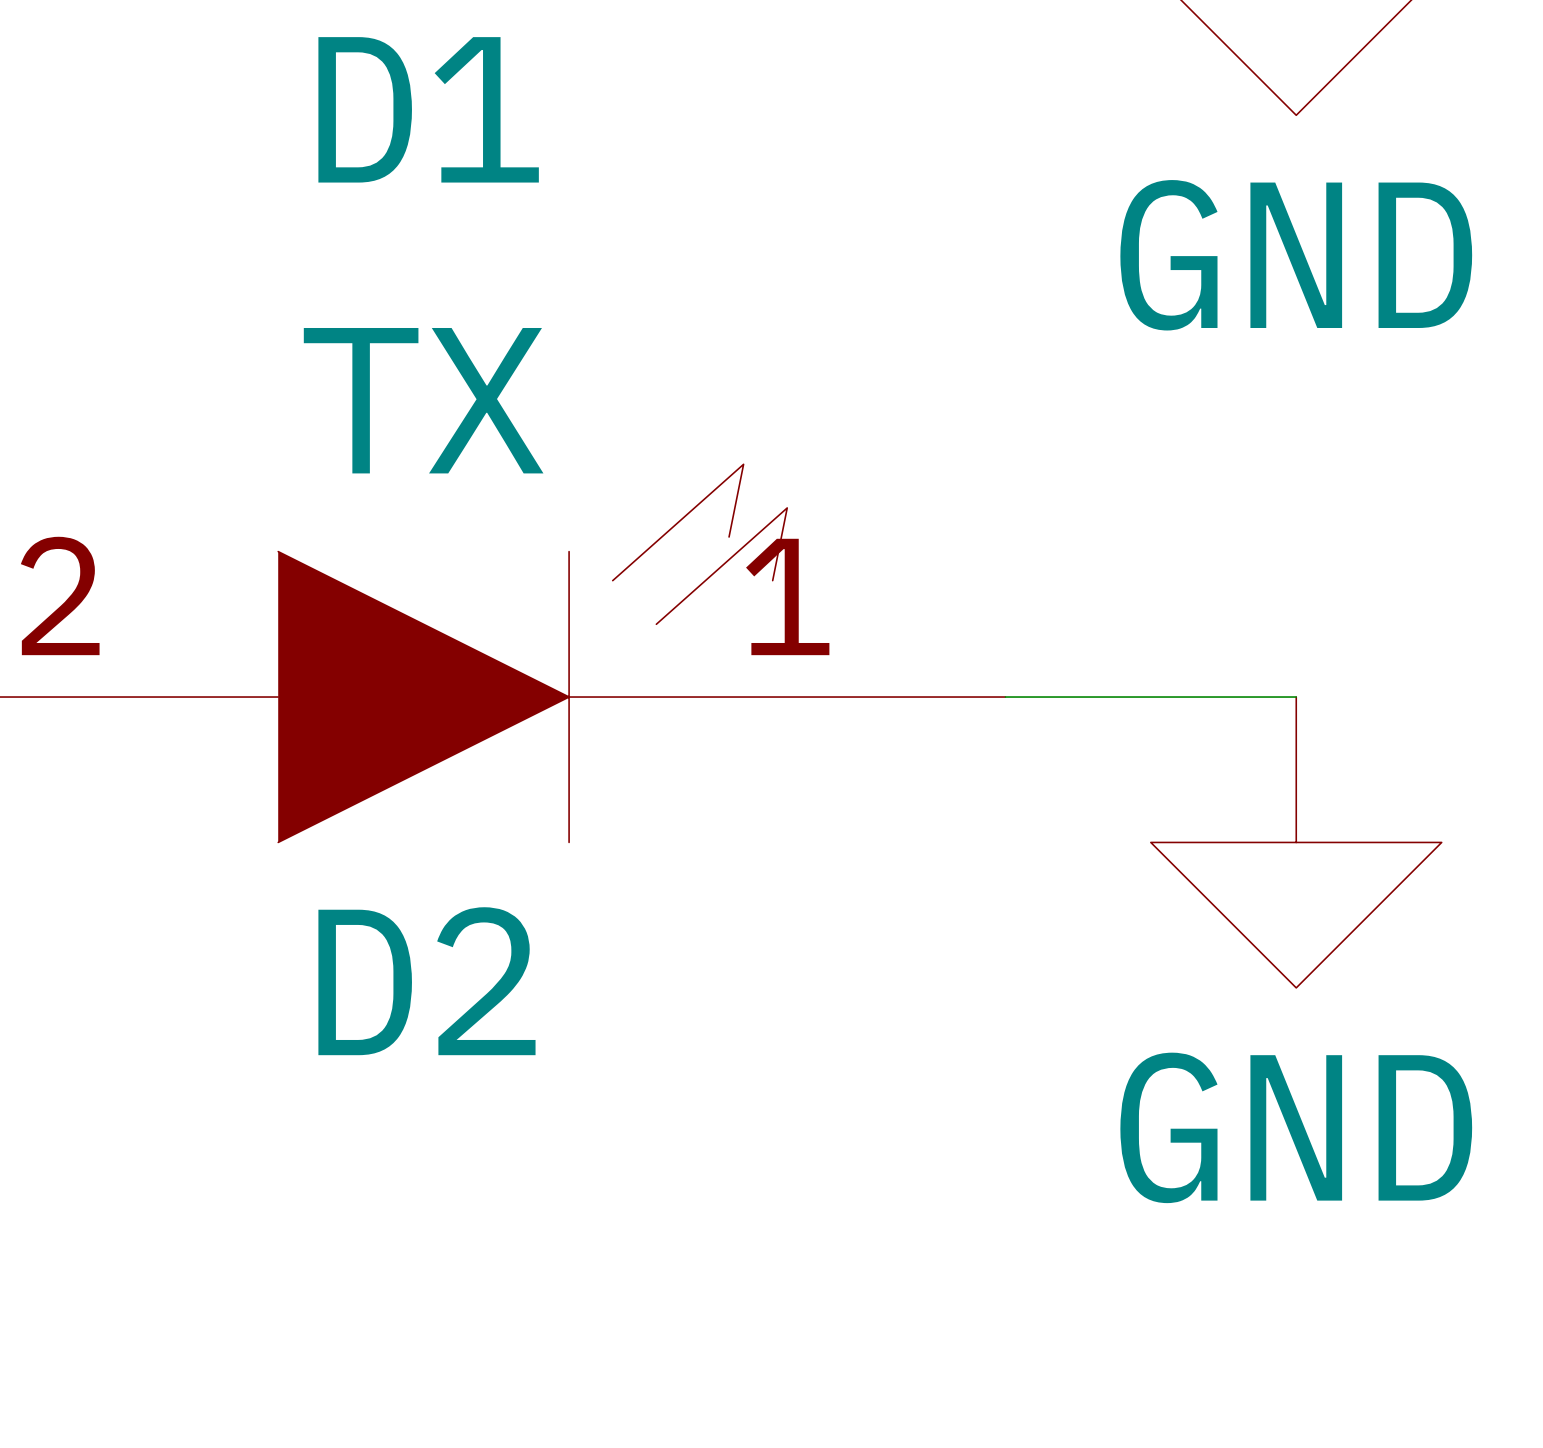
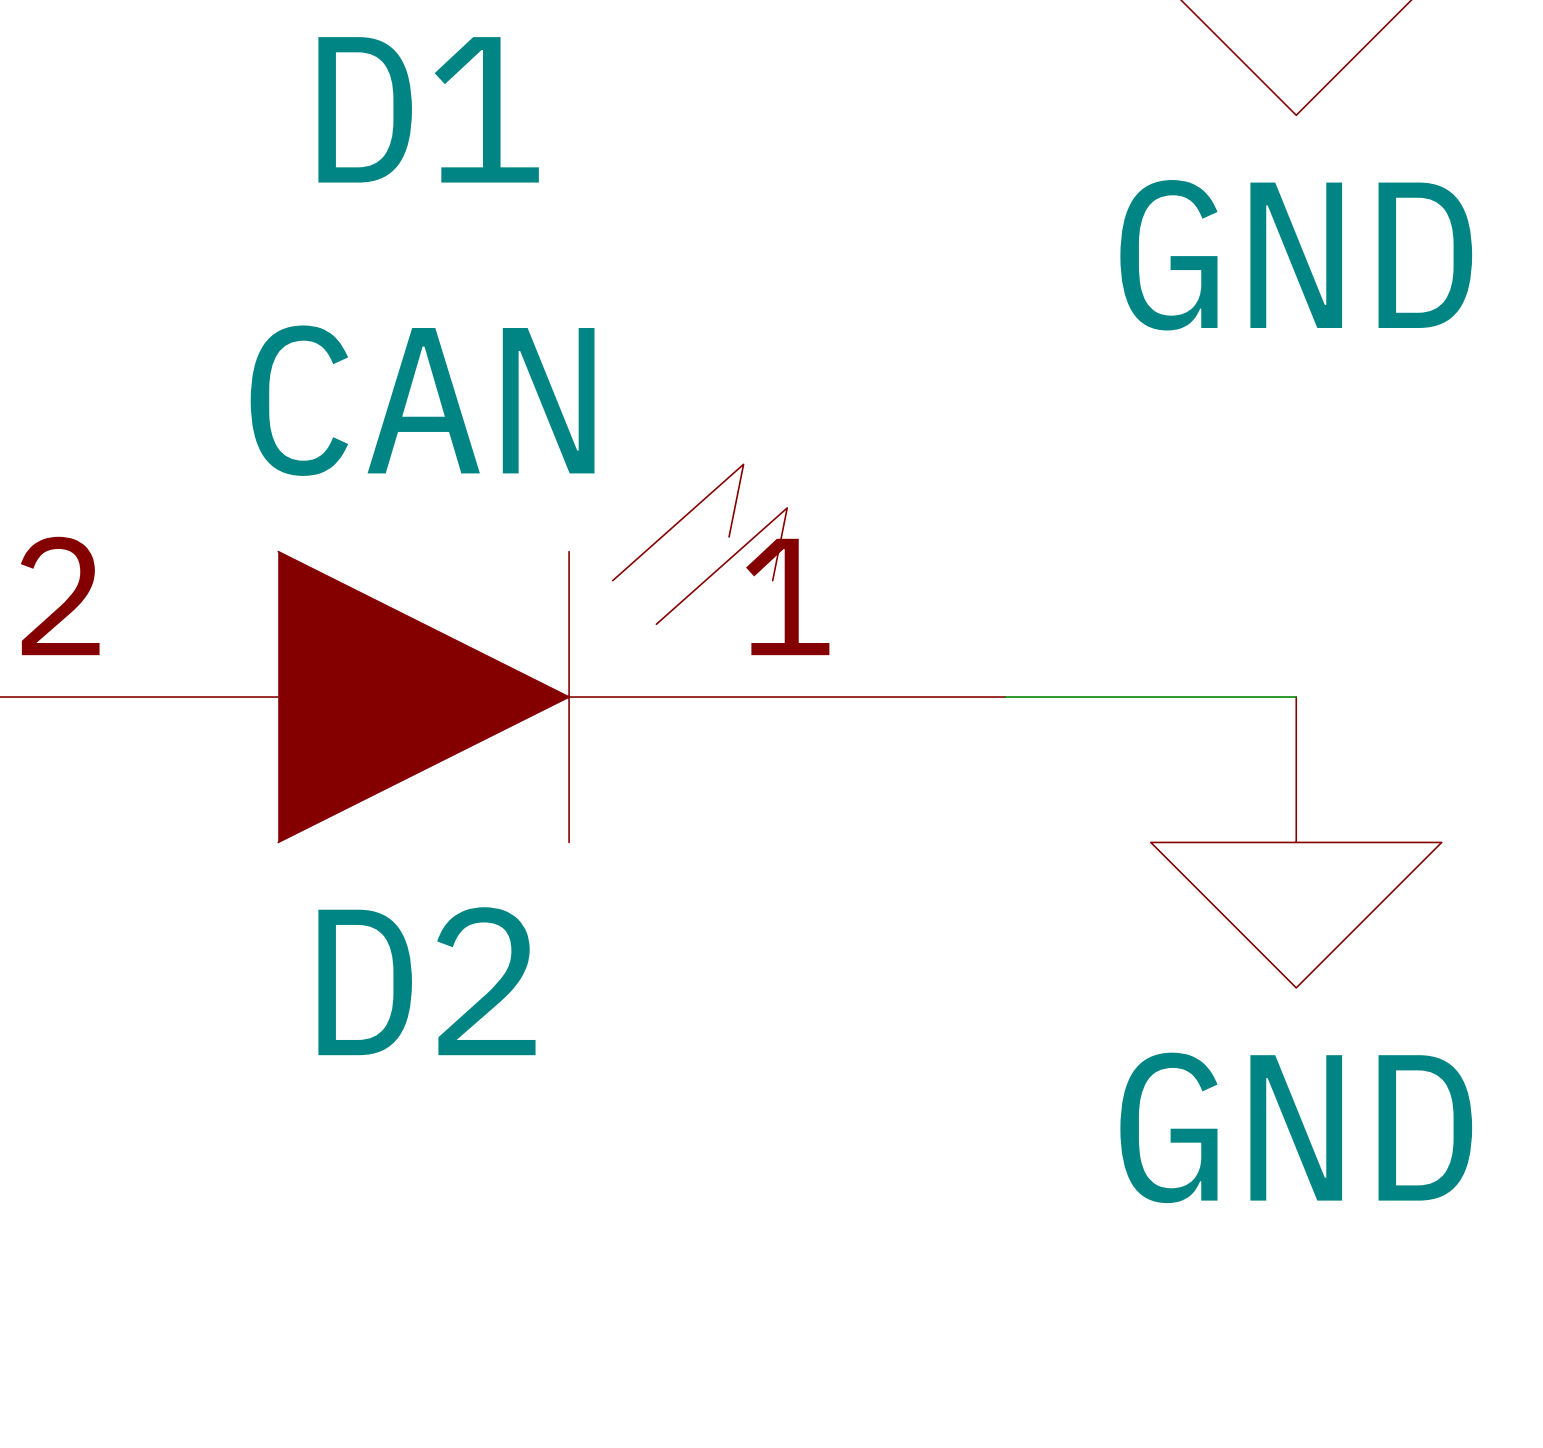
D2 value: TX (423, 400) -> CAN (422, 400)

